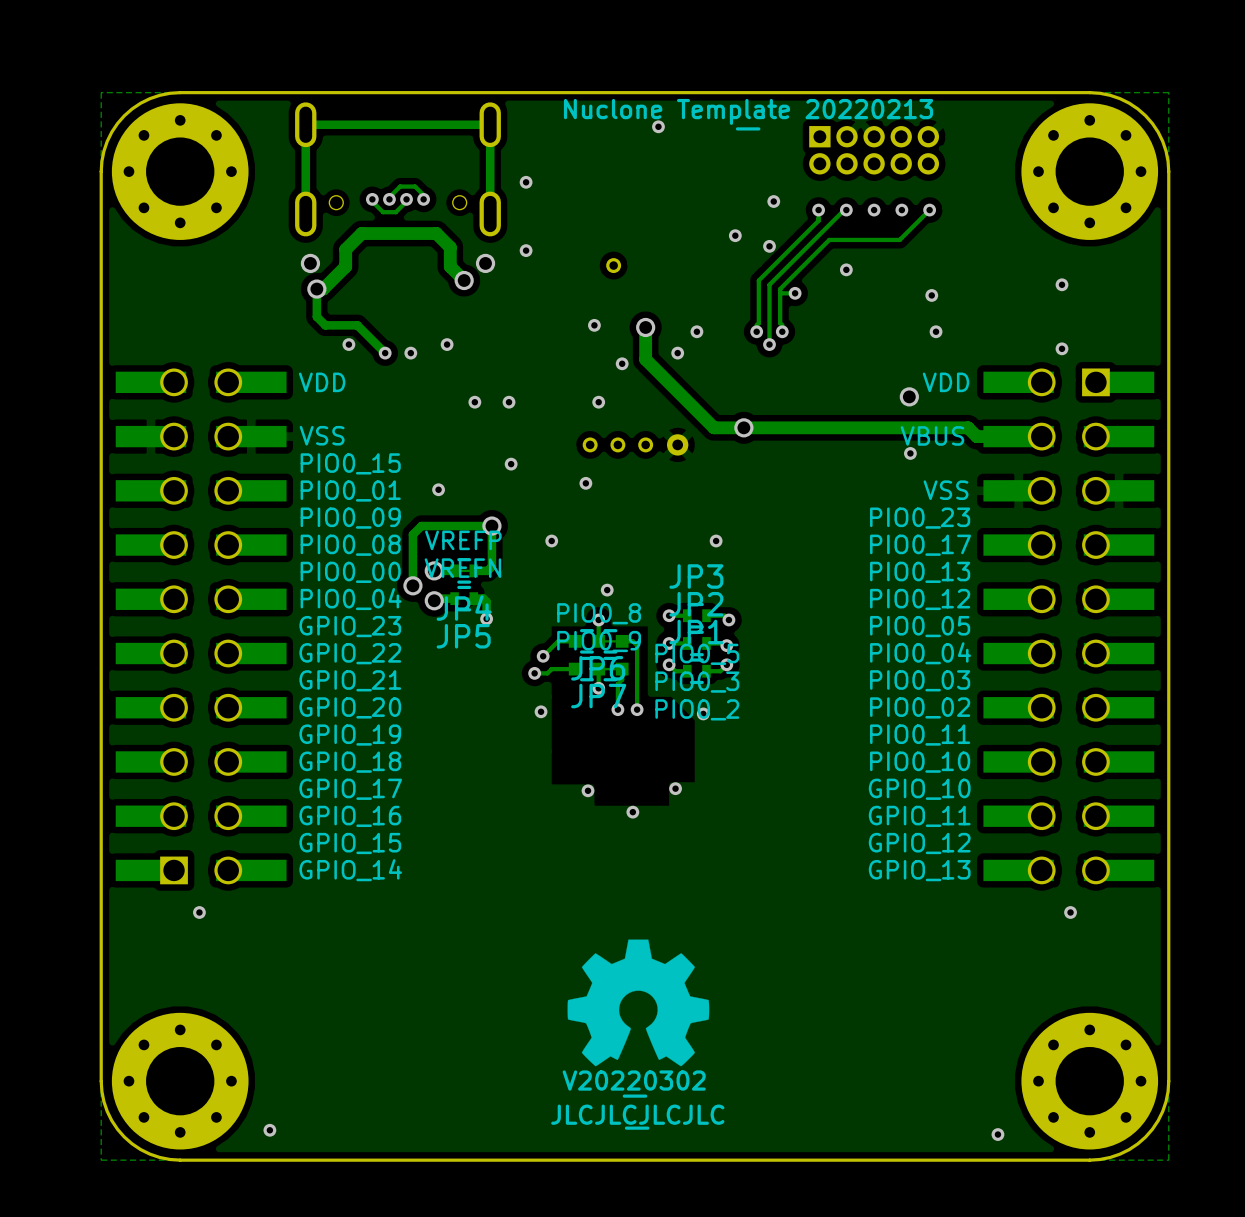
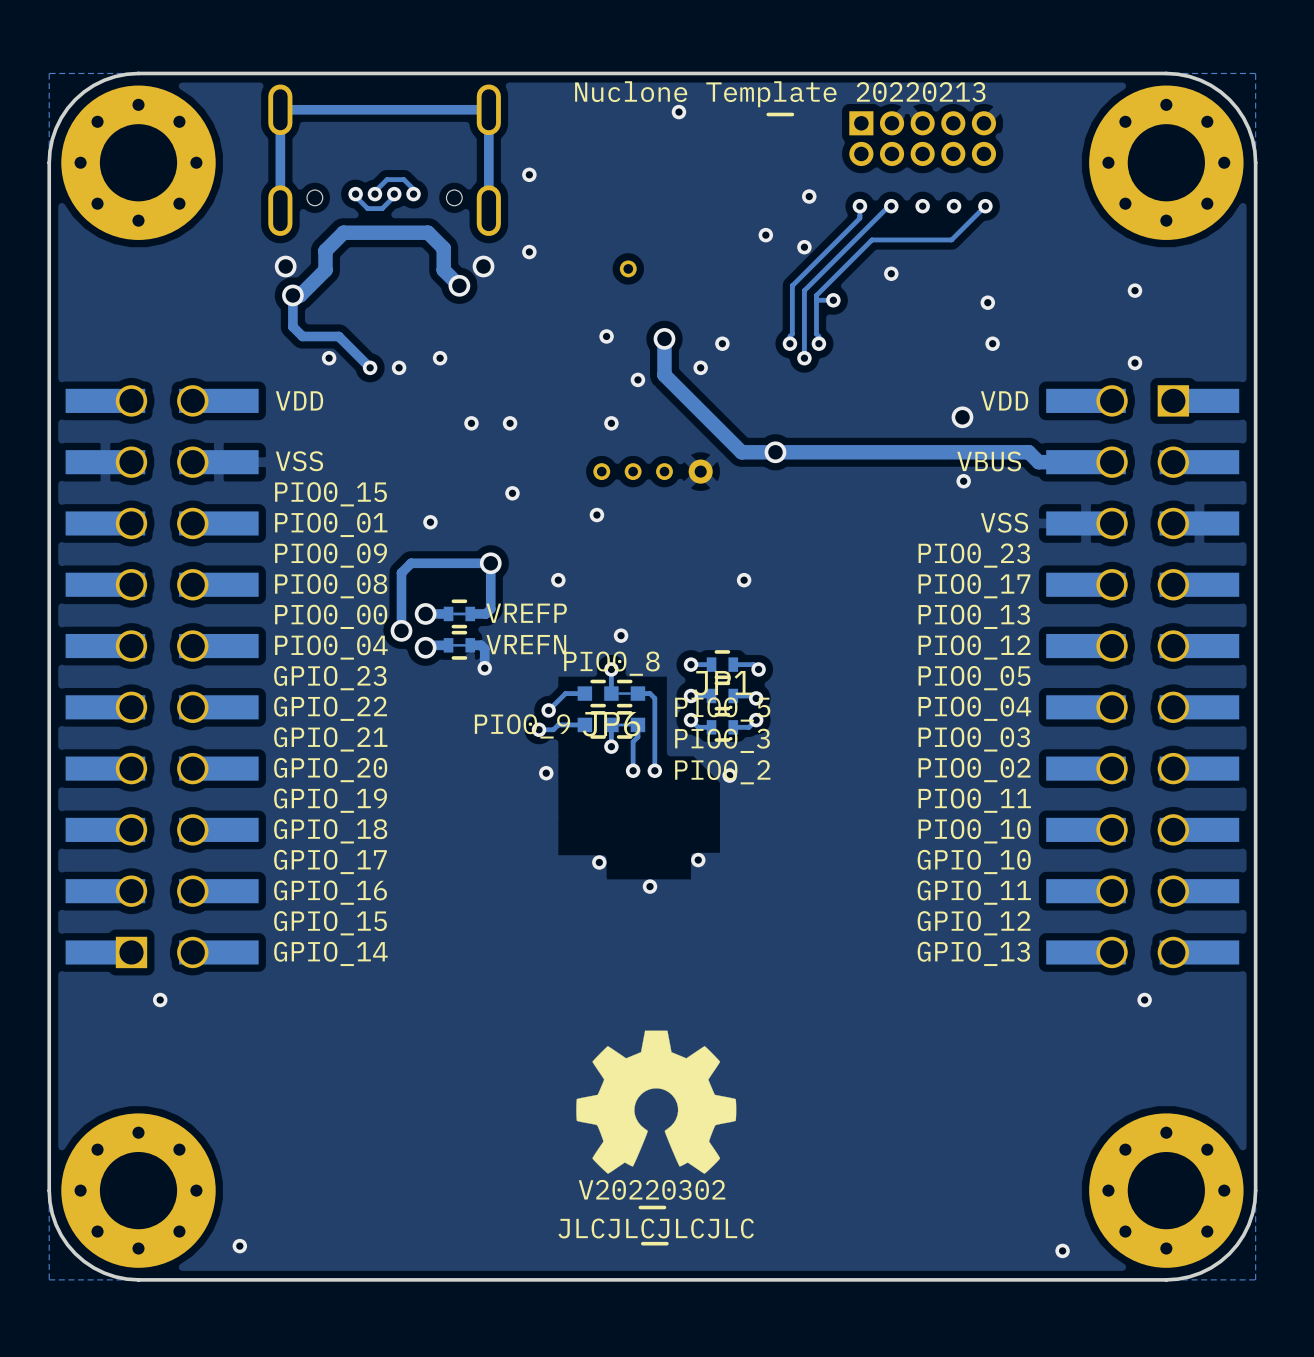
JP4 value position: VREFP (463, 540) -> VREFP (526, 613)
JP5 value position: VREFN (462, 568) -> VREFN (526, 644)
JP3 name: JP3 (696, 576) -> none
JP2 name: JP2 (696, 604) -> none
JP4 name: JP4 (464, 608) -> none
JP5 name: JP5 (463, 636) -> none
JP7 value position: PIO0_9 (599, 641) -> PIO0_9 (522, 726)
JP7 name: JP7 (598, 696) -> none

